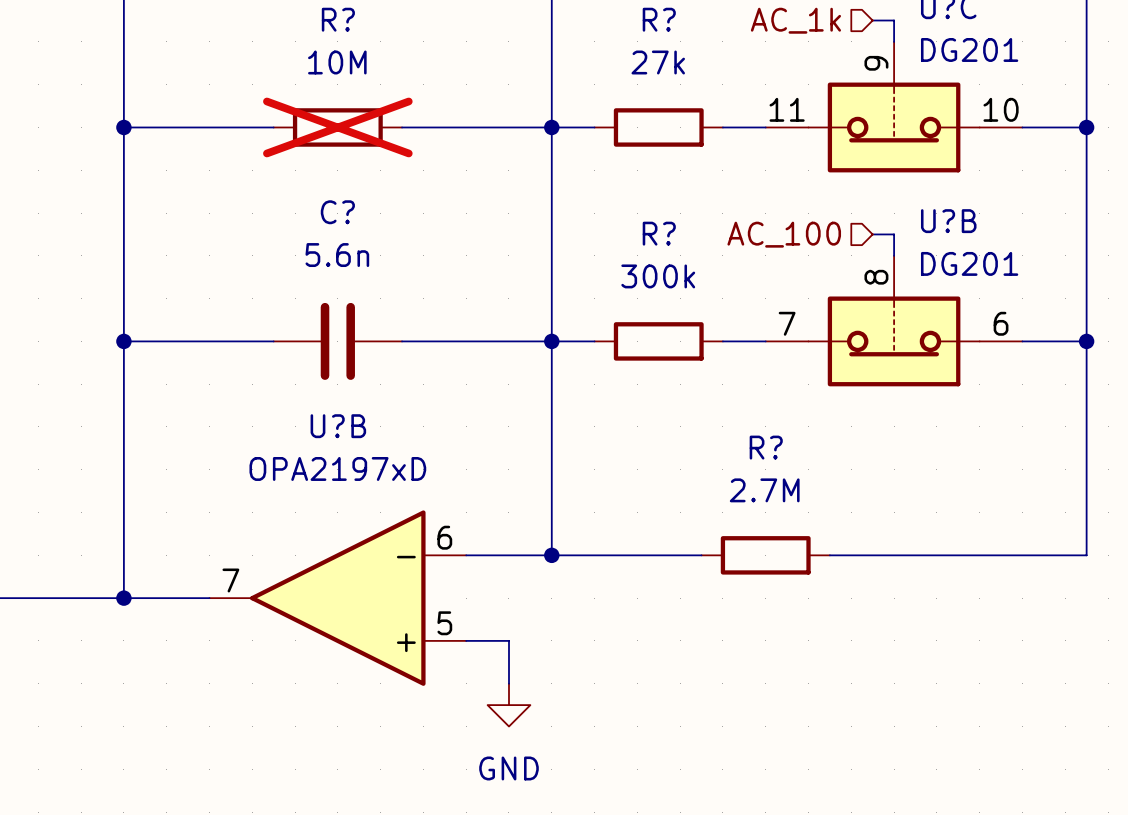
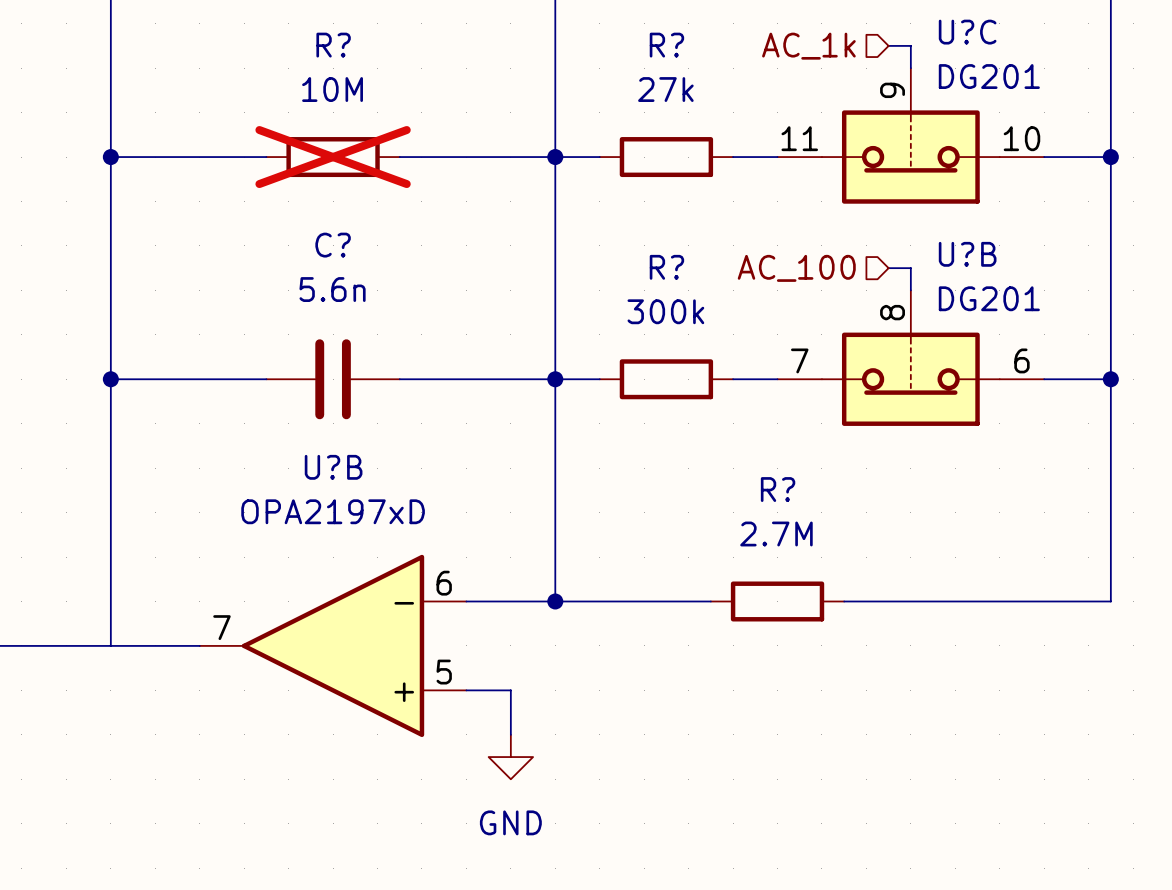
junction: (123, 598) -> none

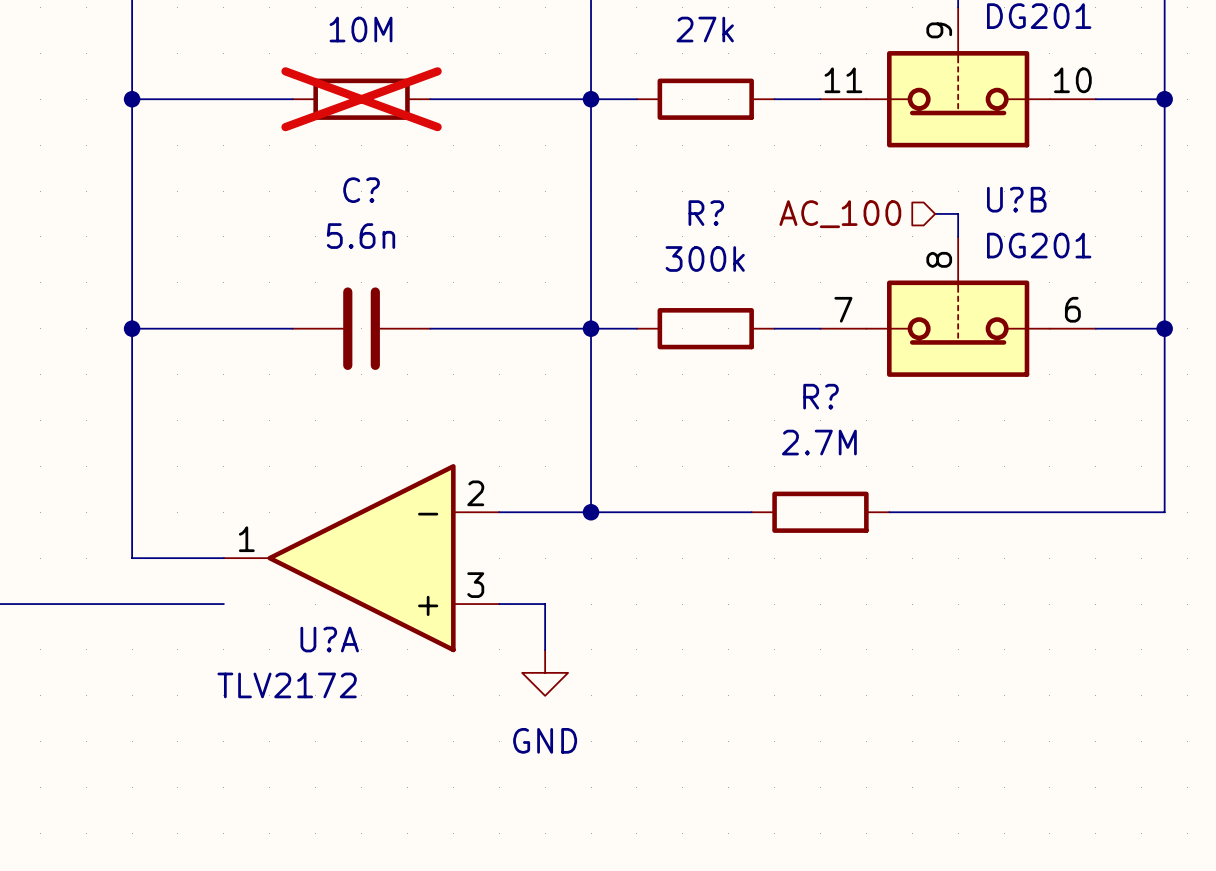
wire: (555, 557) (555, 601) -> none
wire: (1110, 557) (1110, 601) (844, 601) -> (1164, 512) (889, 512)
wire: (110, 601) (110, 645) -> (132, 558) (223, 558)
U?A: none -> TLV2172 (361, 558)
wire: (466, 601) (710, 601) -> (499, 512) (751, 512)
junction position: (555, 601) -> (591, 512)
R? position: (777, 601) -> (820, 512)
U?B: OPA2197xD (333, 645) -> none
wire: (466, 690) (510, 690) (510, 734) -> (499, 604) (545, 604) (545, 649)
power symbol position: GND (510, 757) -> GND (545, 672)

